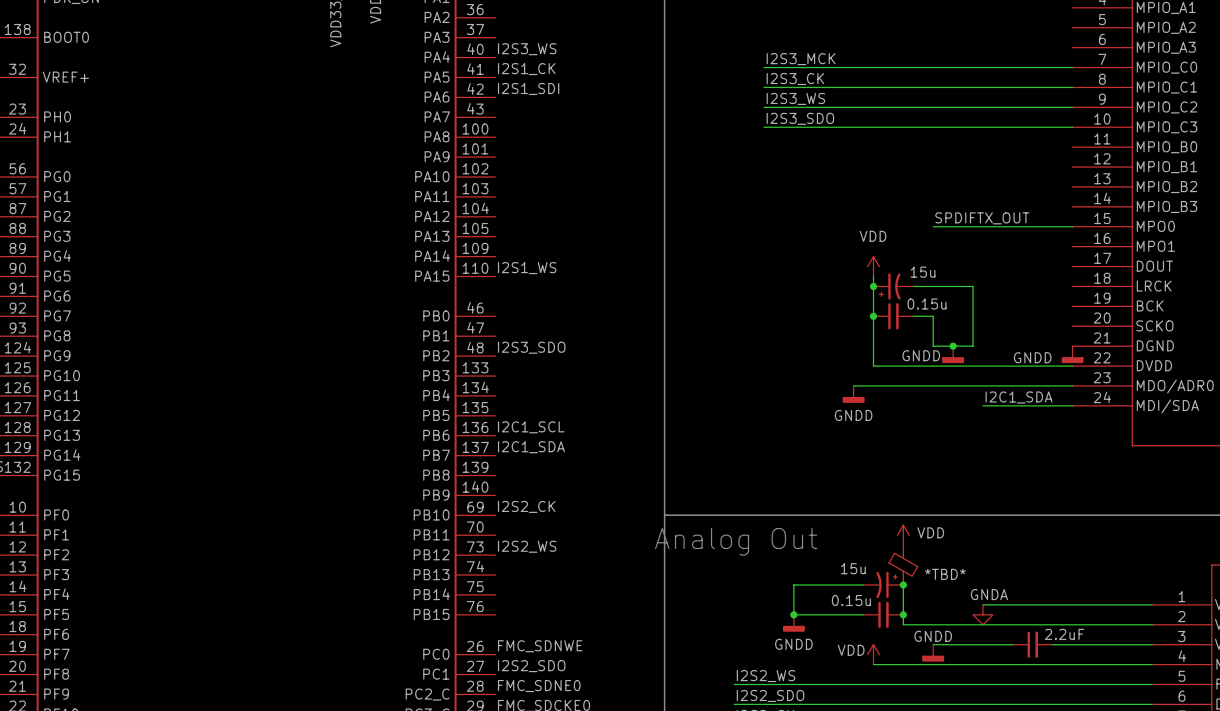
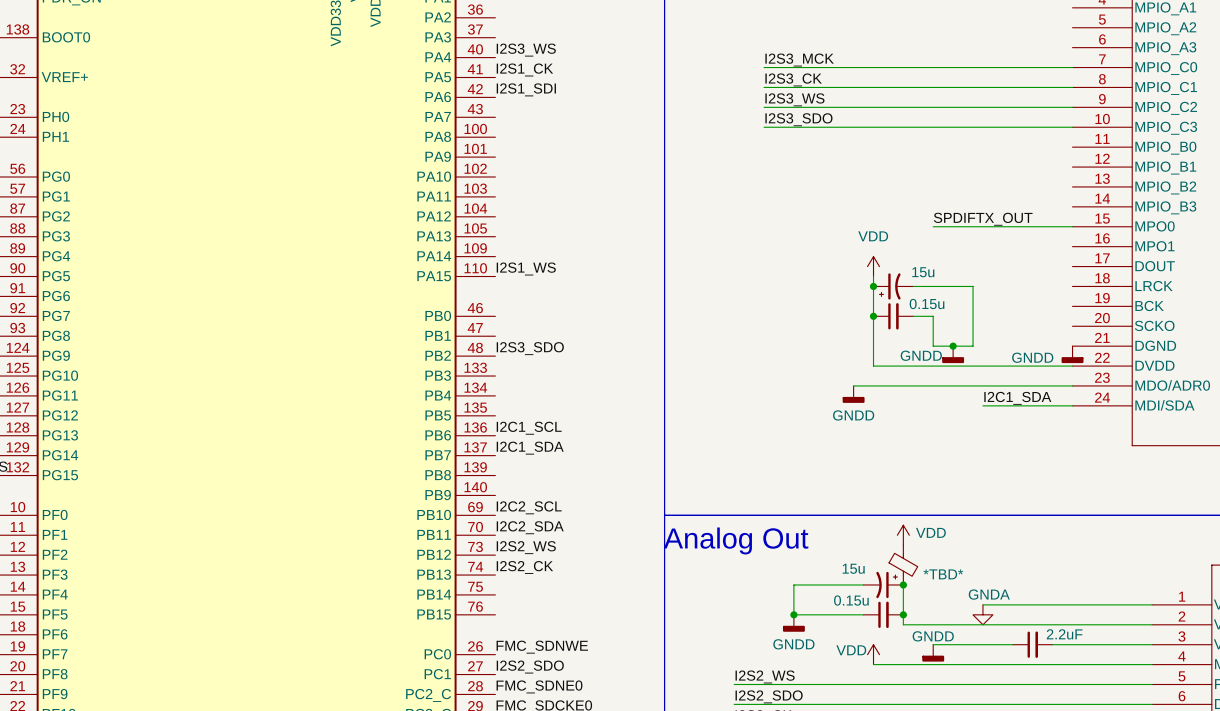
label: I2S2_CK (526, 506) -> I2C2_SCL (529, 507)
label: none -> I2C2_SDA (530, 527)
label: none -> I2S2_CK (524, 567)

